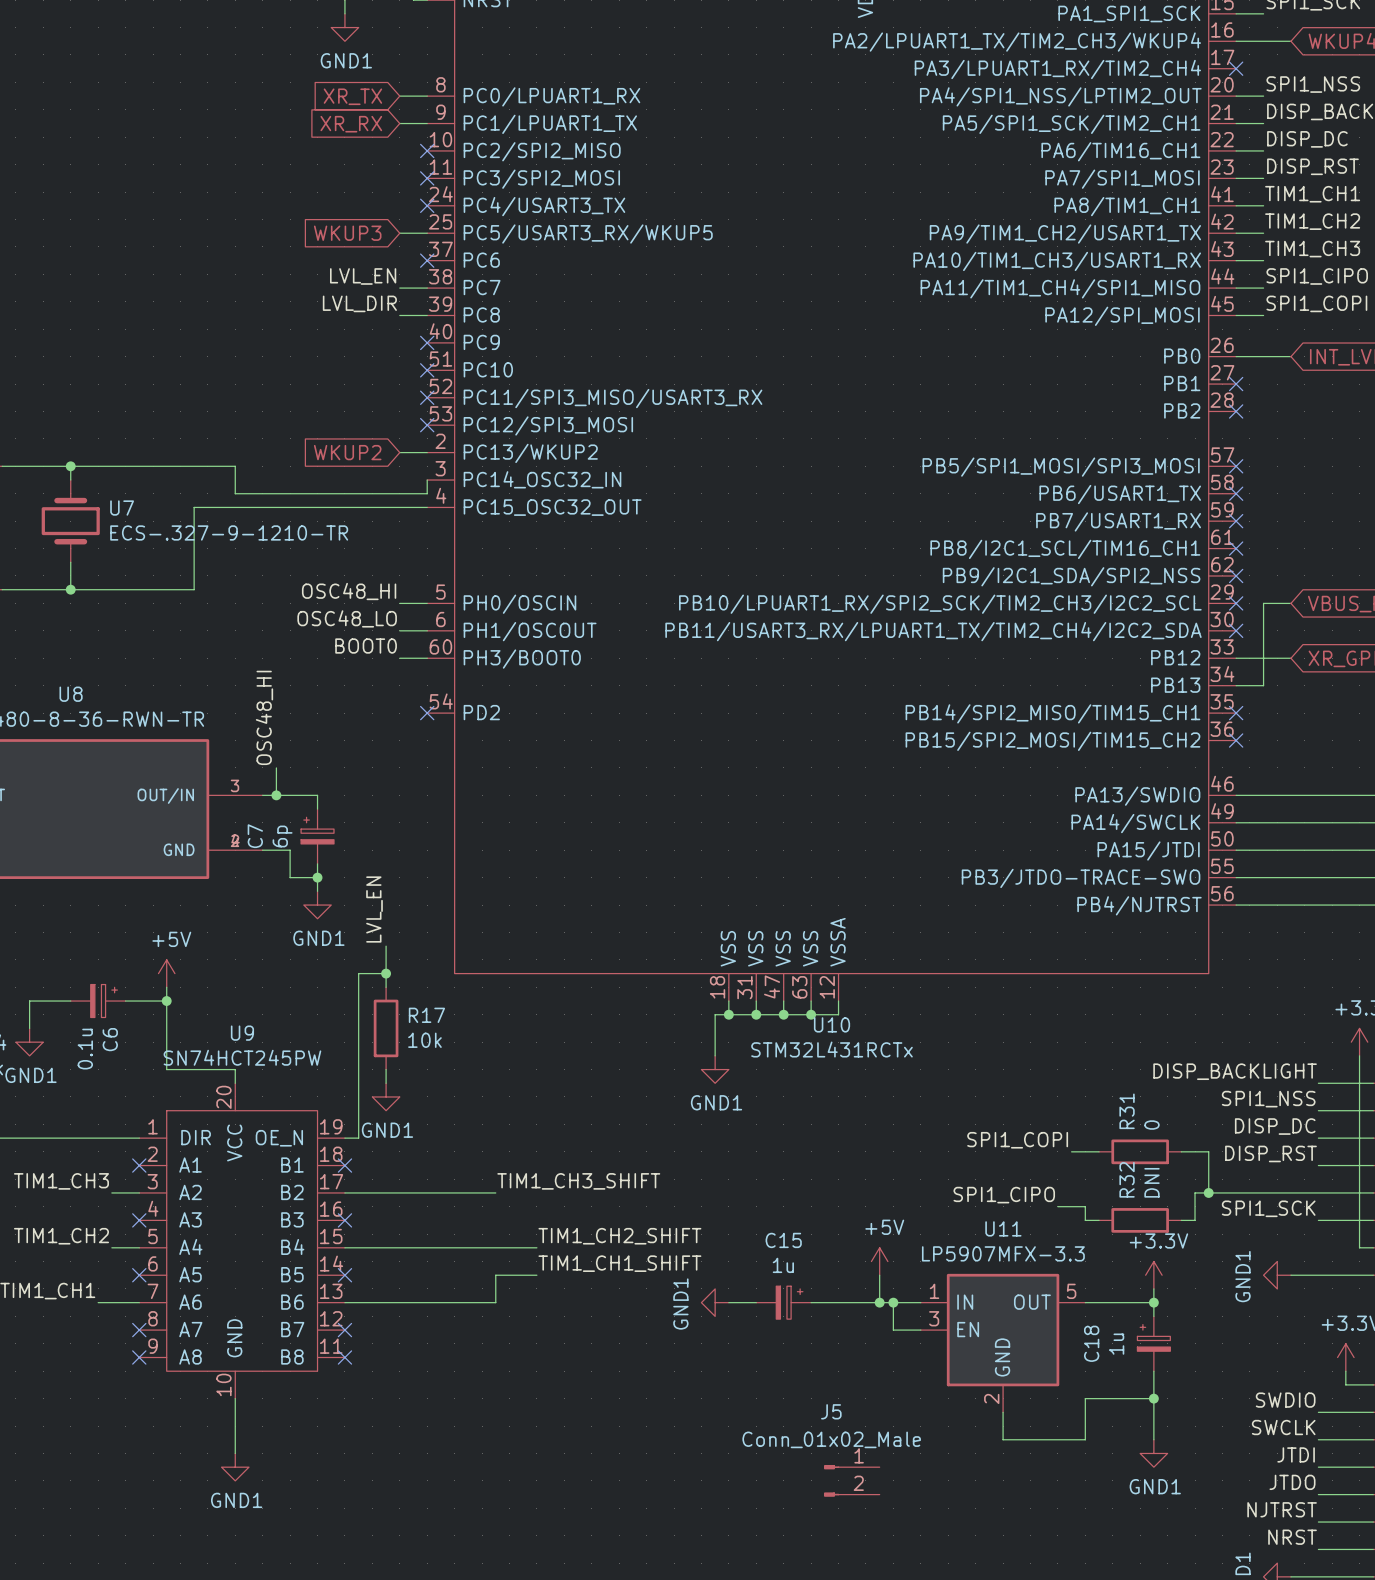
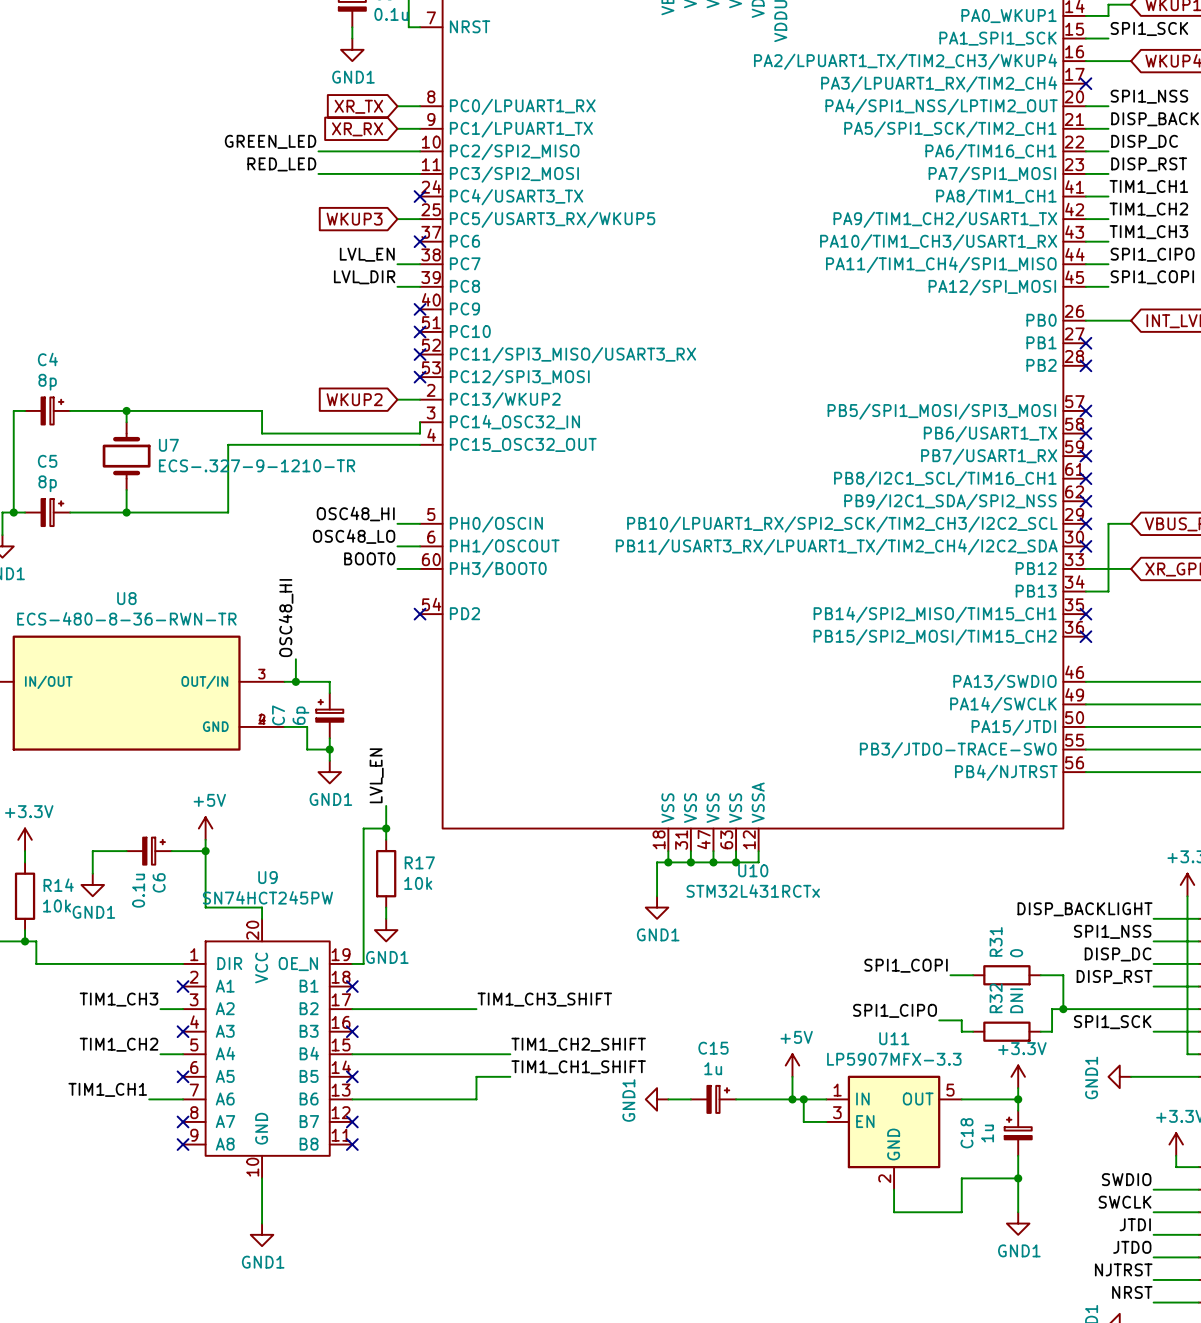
label: none -> GREEN_LED (270, 141)
wire: none -> (318, 151) (420, 151)
no-connect mark: (427, 150) -> none
label: none -> RED_LED (281, 164)
wire: none -> (318, 173) (420, 173)
no-connect mark: (427, 178) -> none
J5: Conn_01x02_Male (851, 1480) -> none

